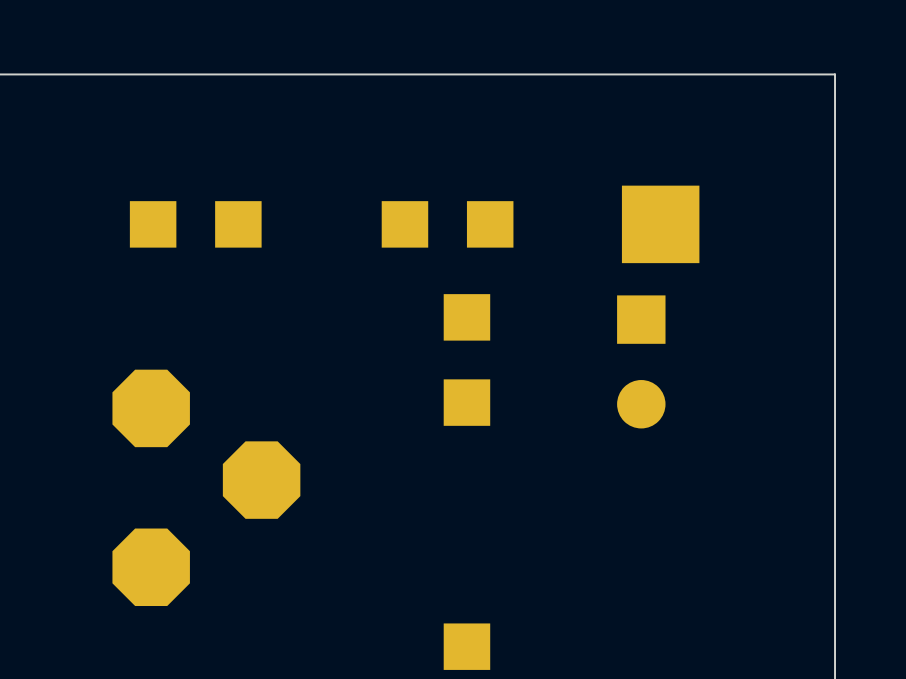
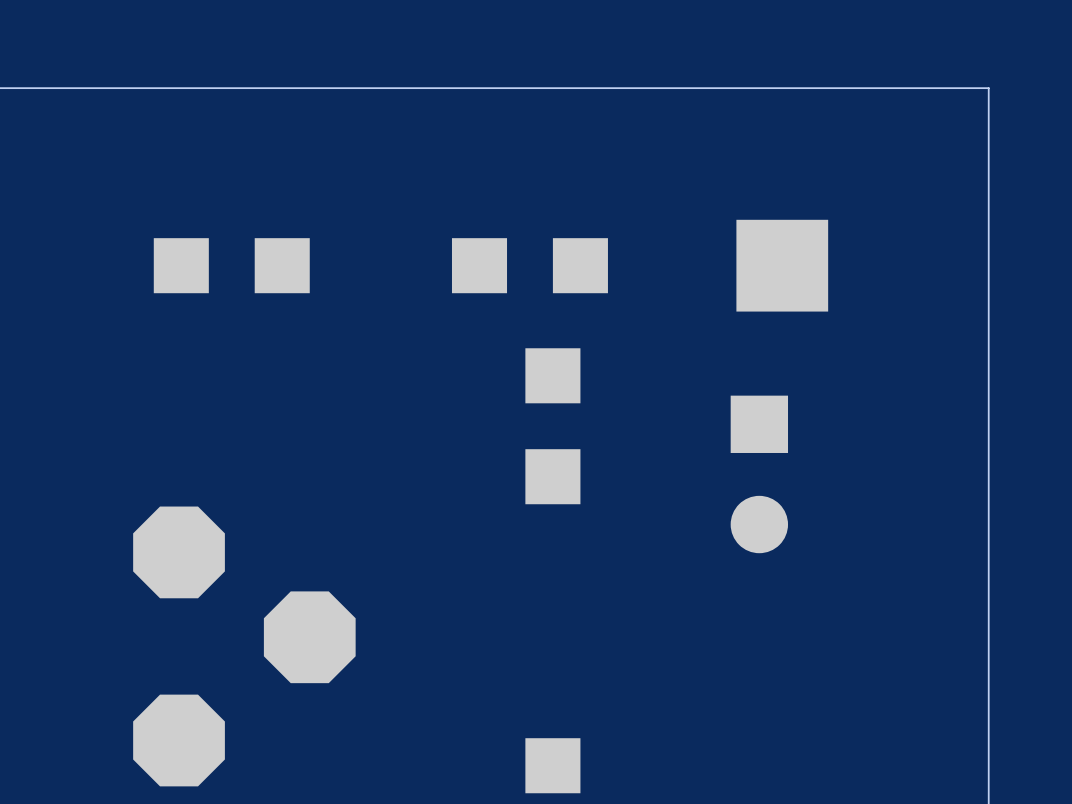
part position: (641, 361) -> (759, 474)
part position: (206, 487) -> (244, 646)

